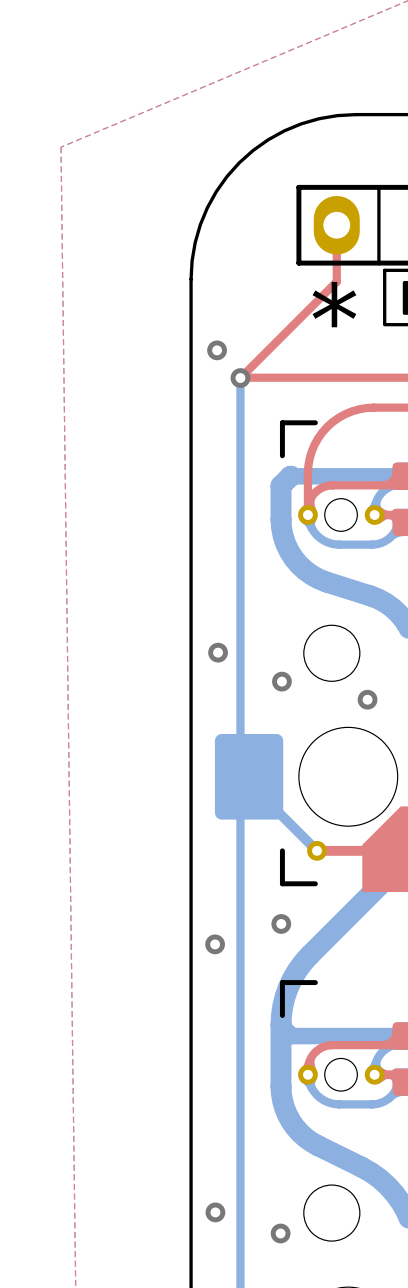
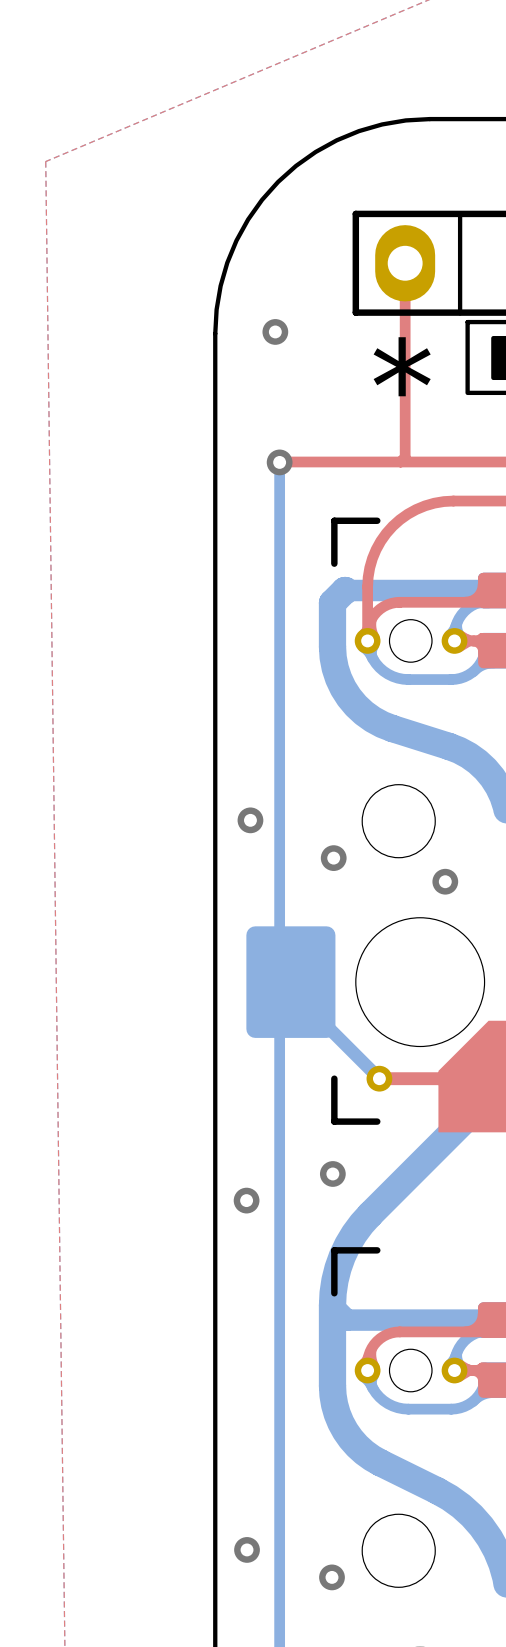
top track: (336, 281) (240, 377) -> (405, 336) (405, 457) (400, 461)
via position: (217, 350) -> (275, 331)

